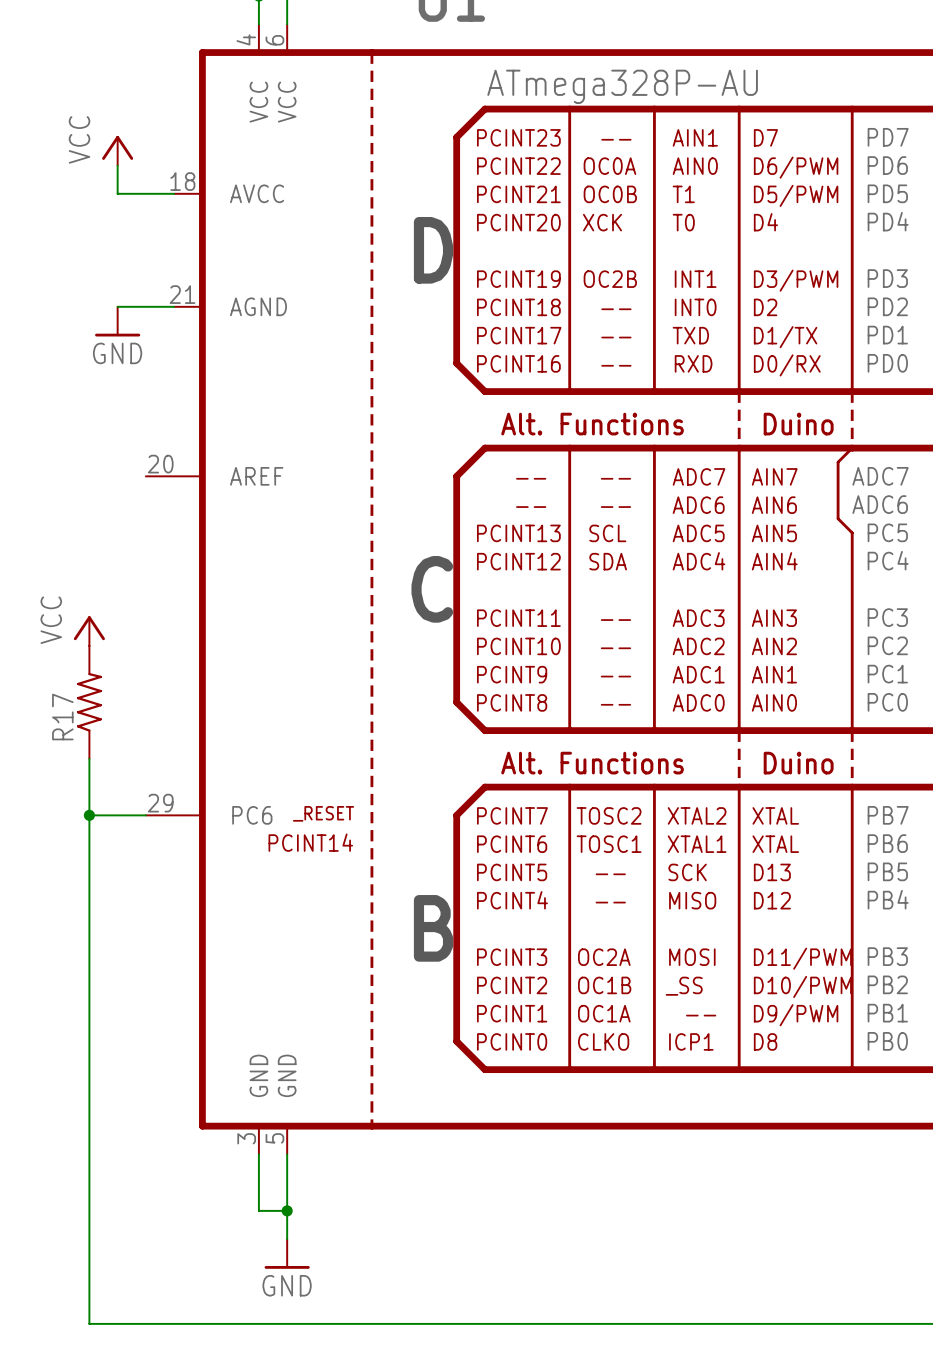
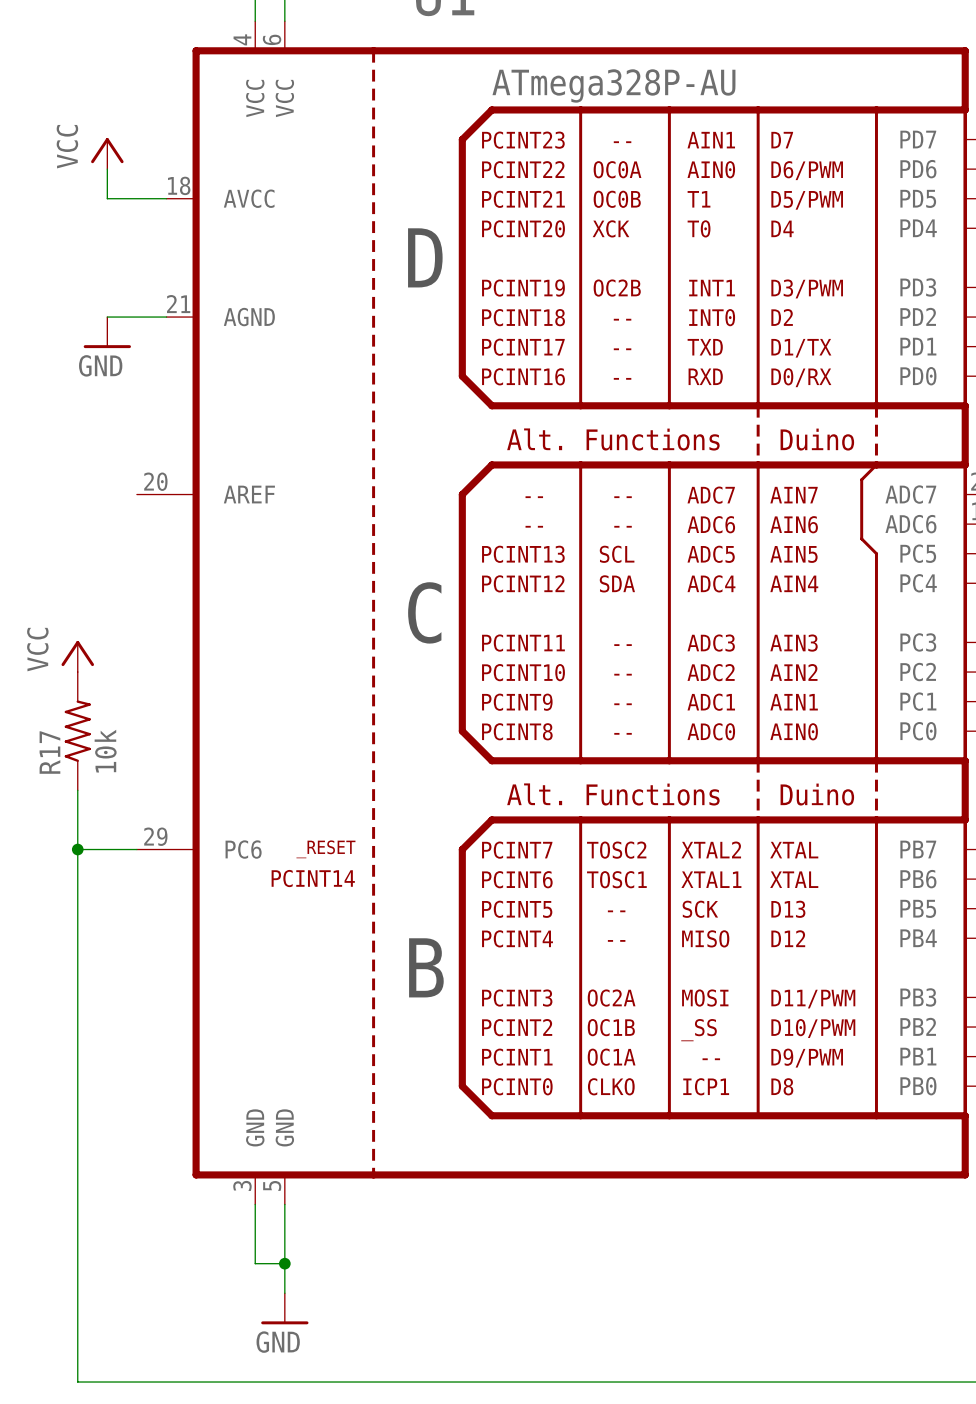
R17 value: none -> 10k (105, 751)

